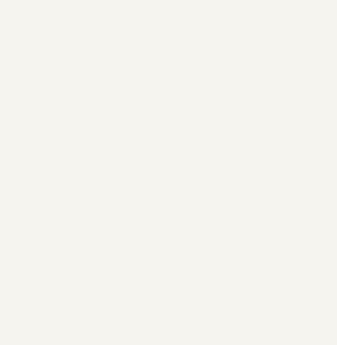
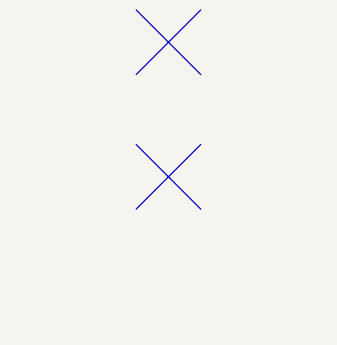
no-connect mark: none -> (168, 42)
no-connect mark: none -> (168, 176)

